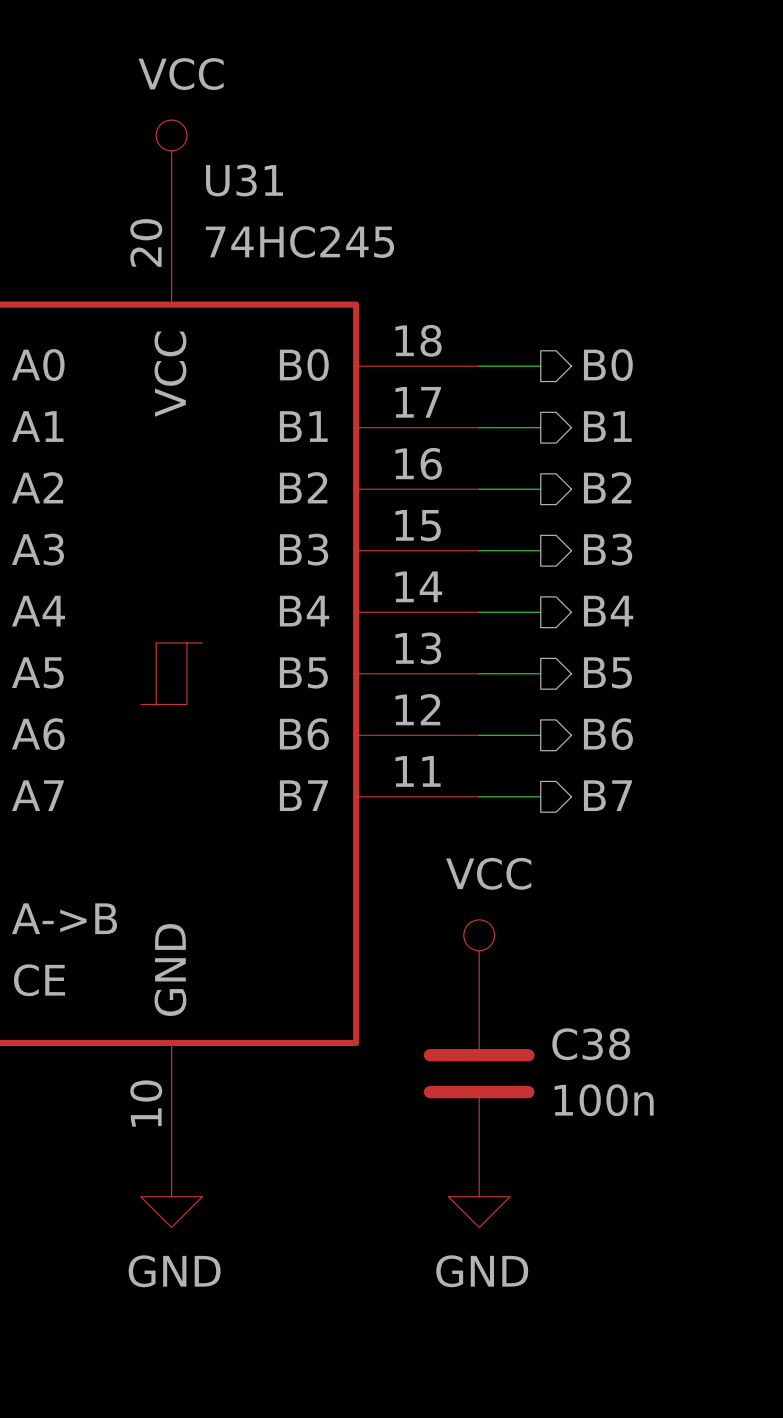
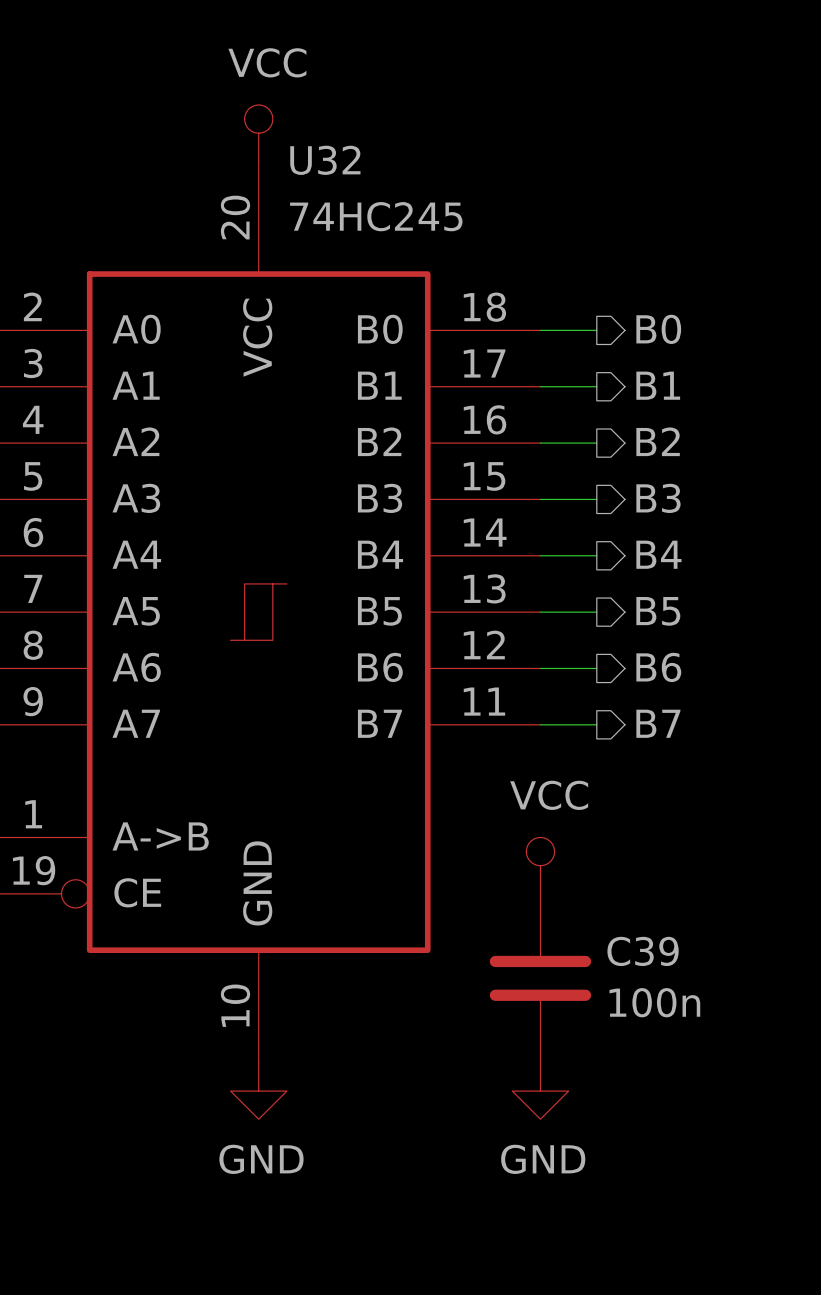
U31 name: U31 (244, 180) -> U32 (325, 160)
C38 name: C38 (591, 1044) -> C39 (643, 951)

